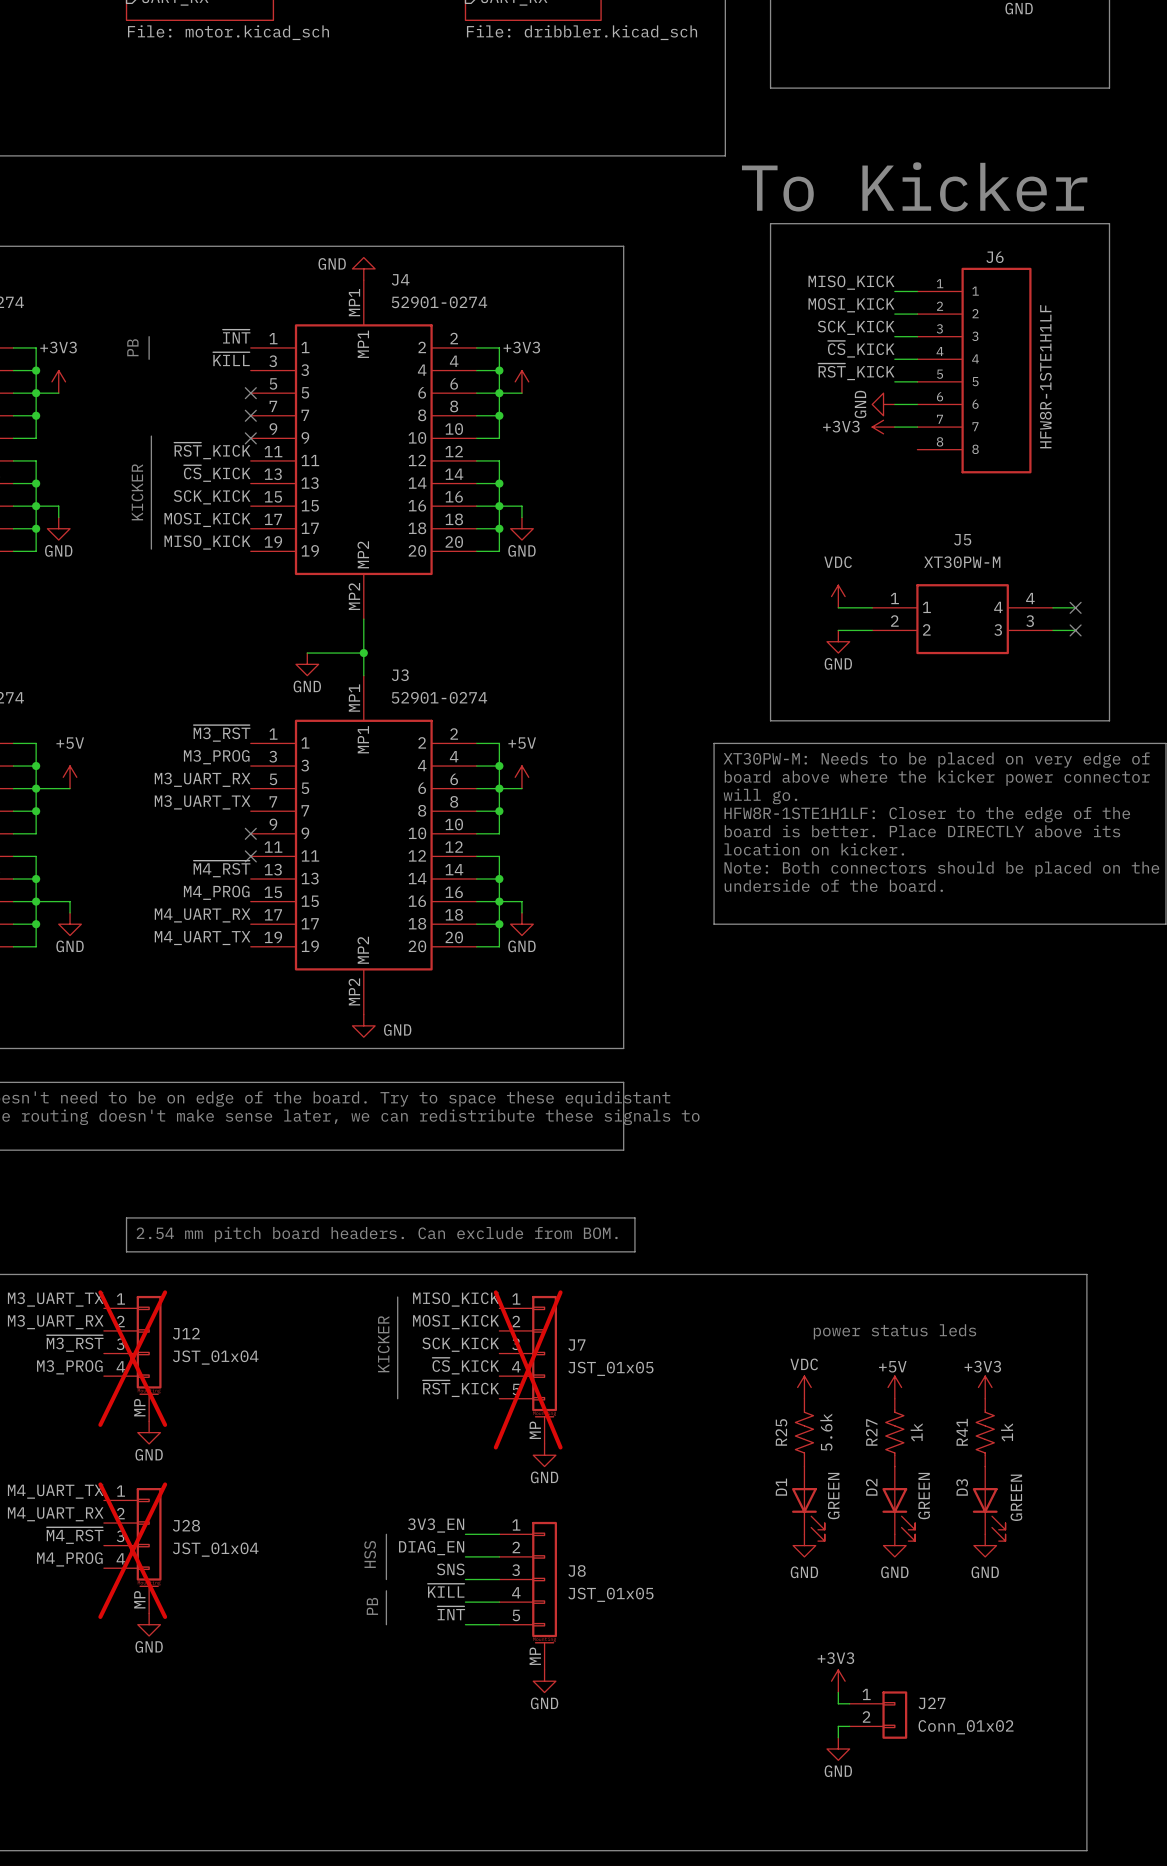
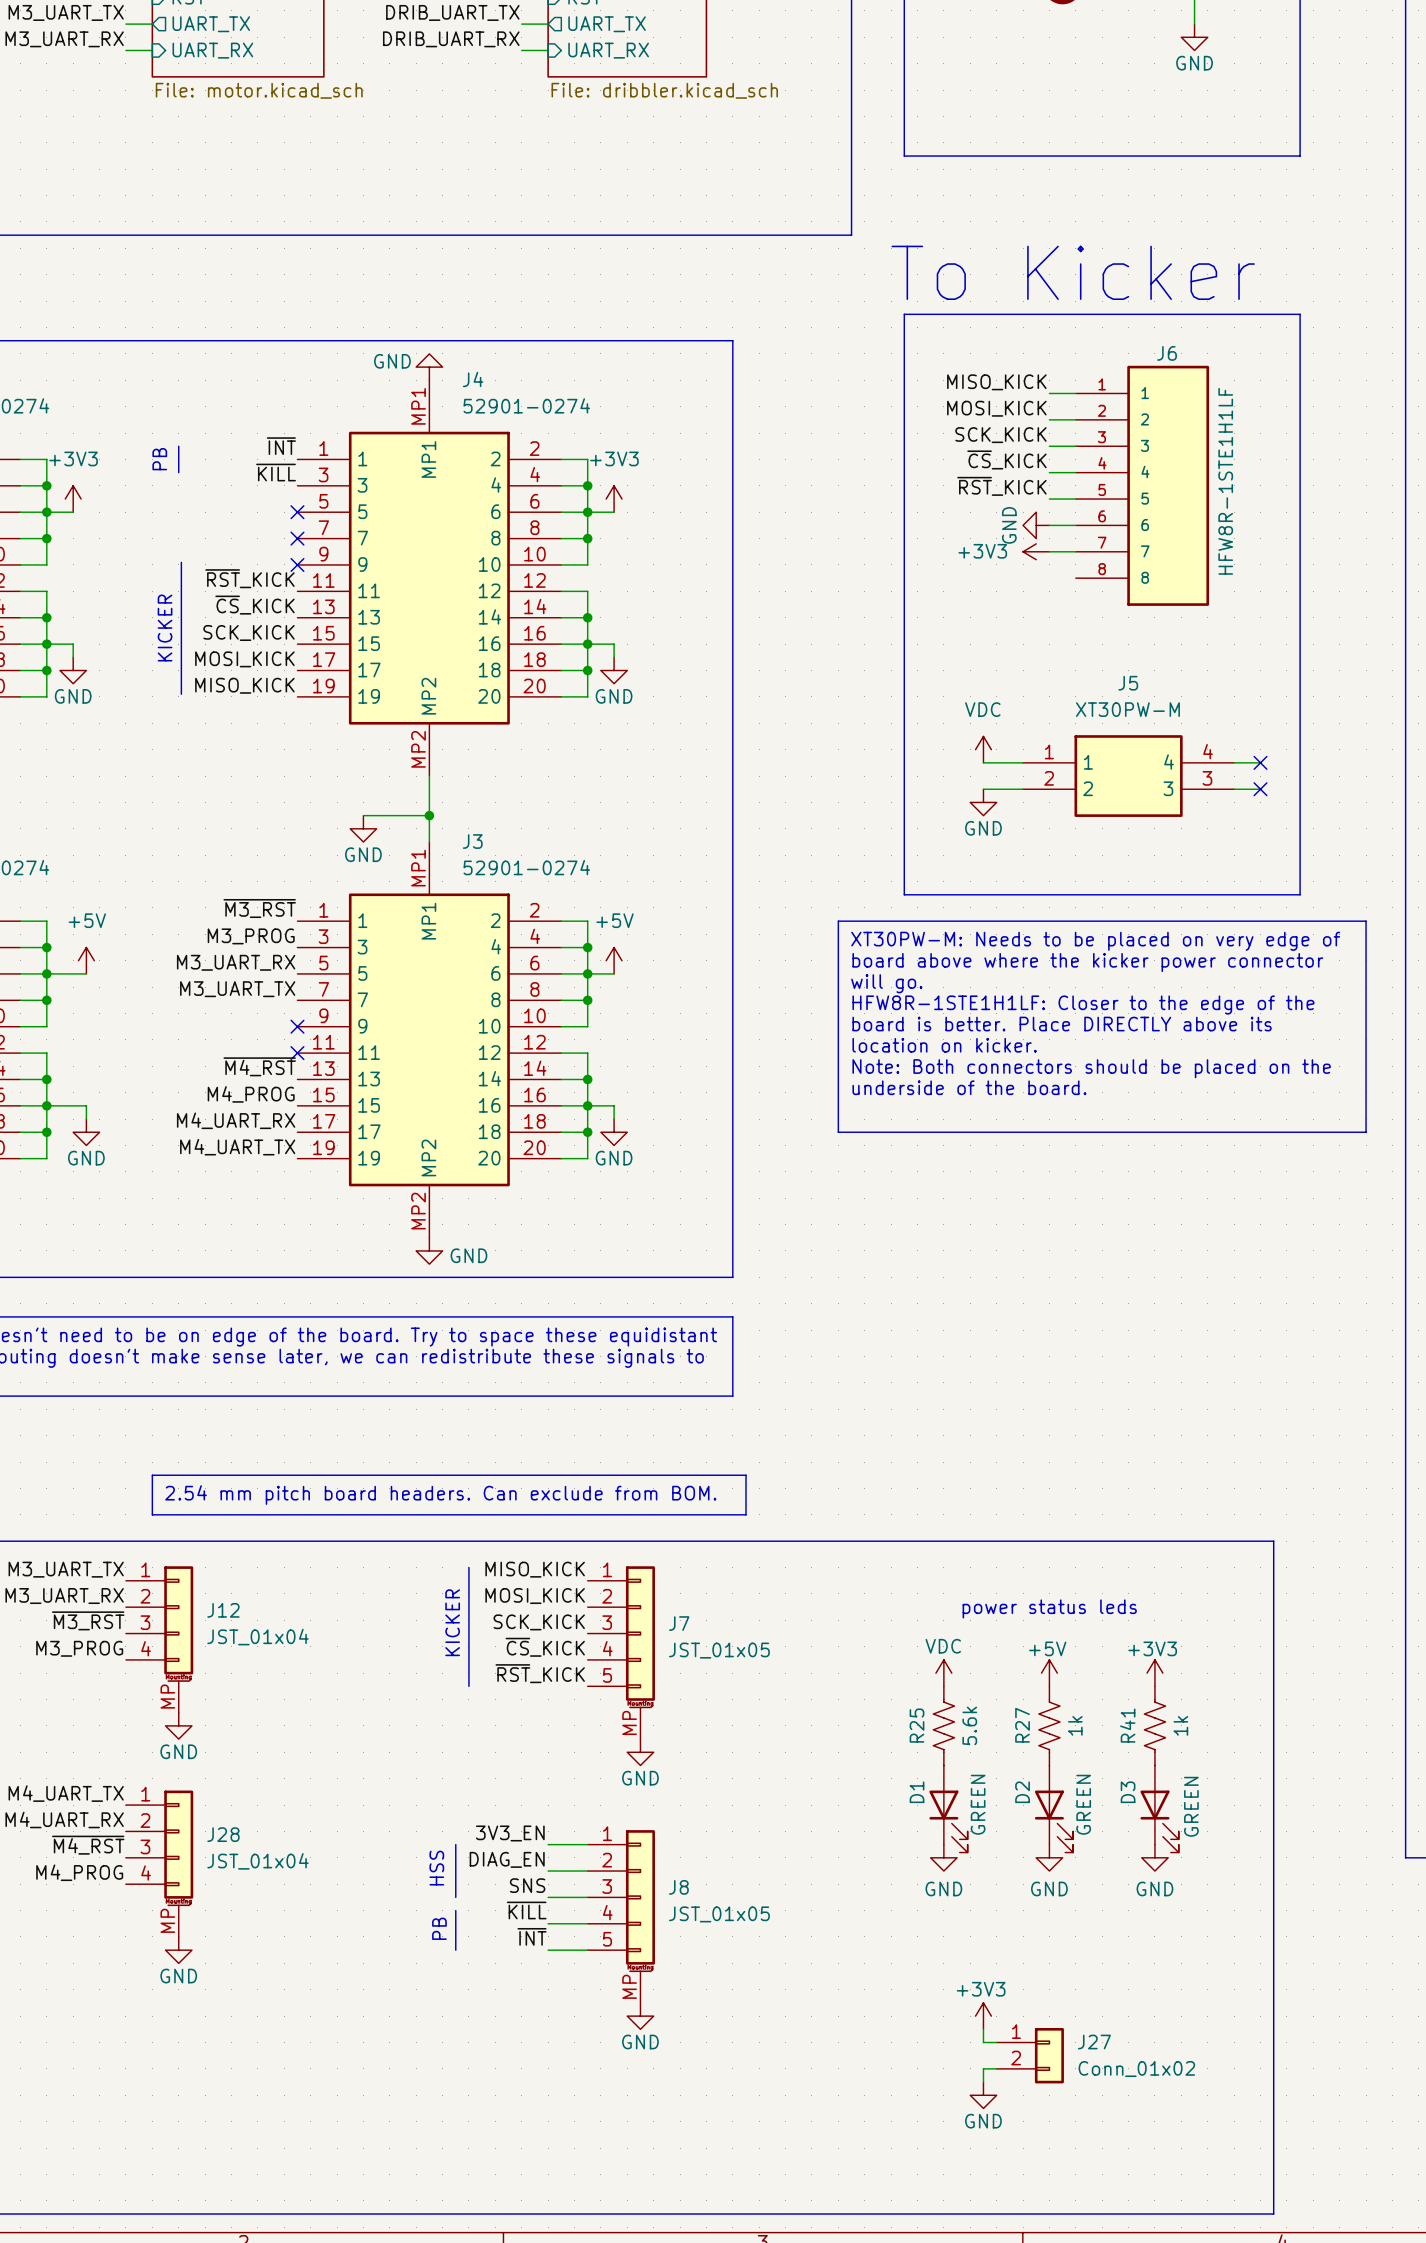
J12 do-not-place cross: (132, 1358) -> none
J7 do-not-place cross: (528, 1369) -> none
J28 do-not-place cross: (132, 1550) -> none

